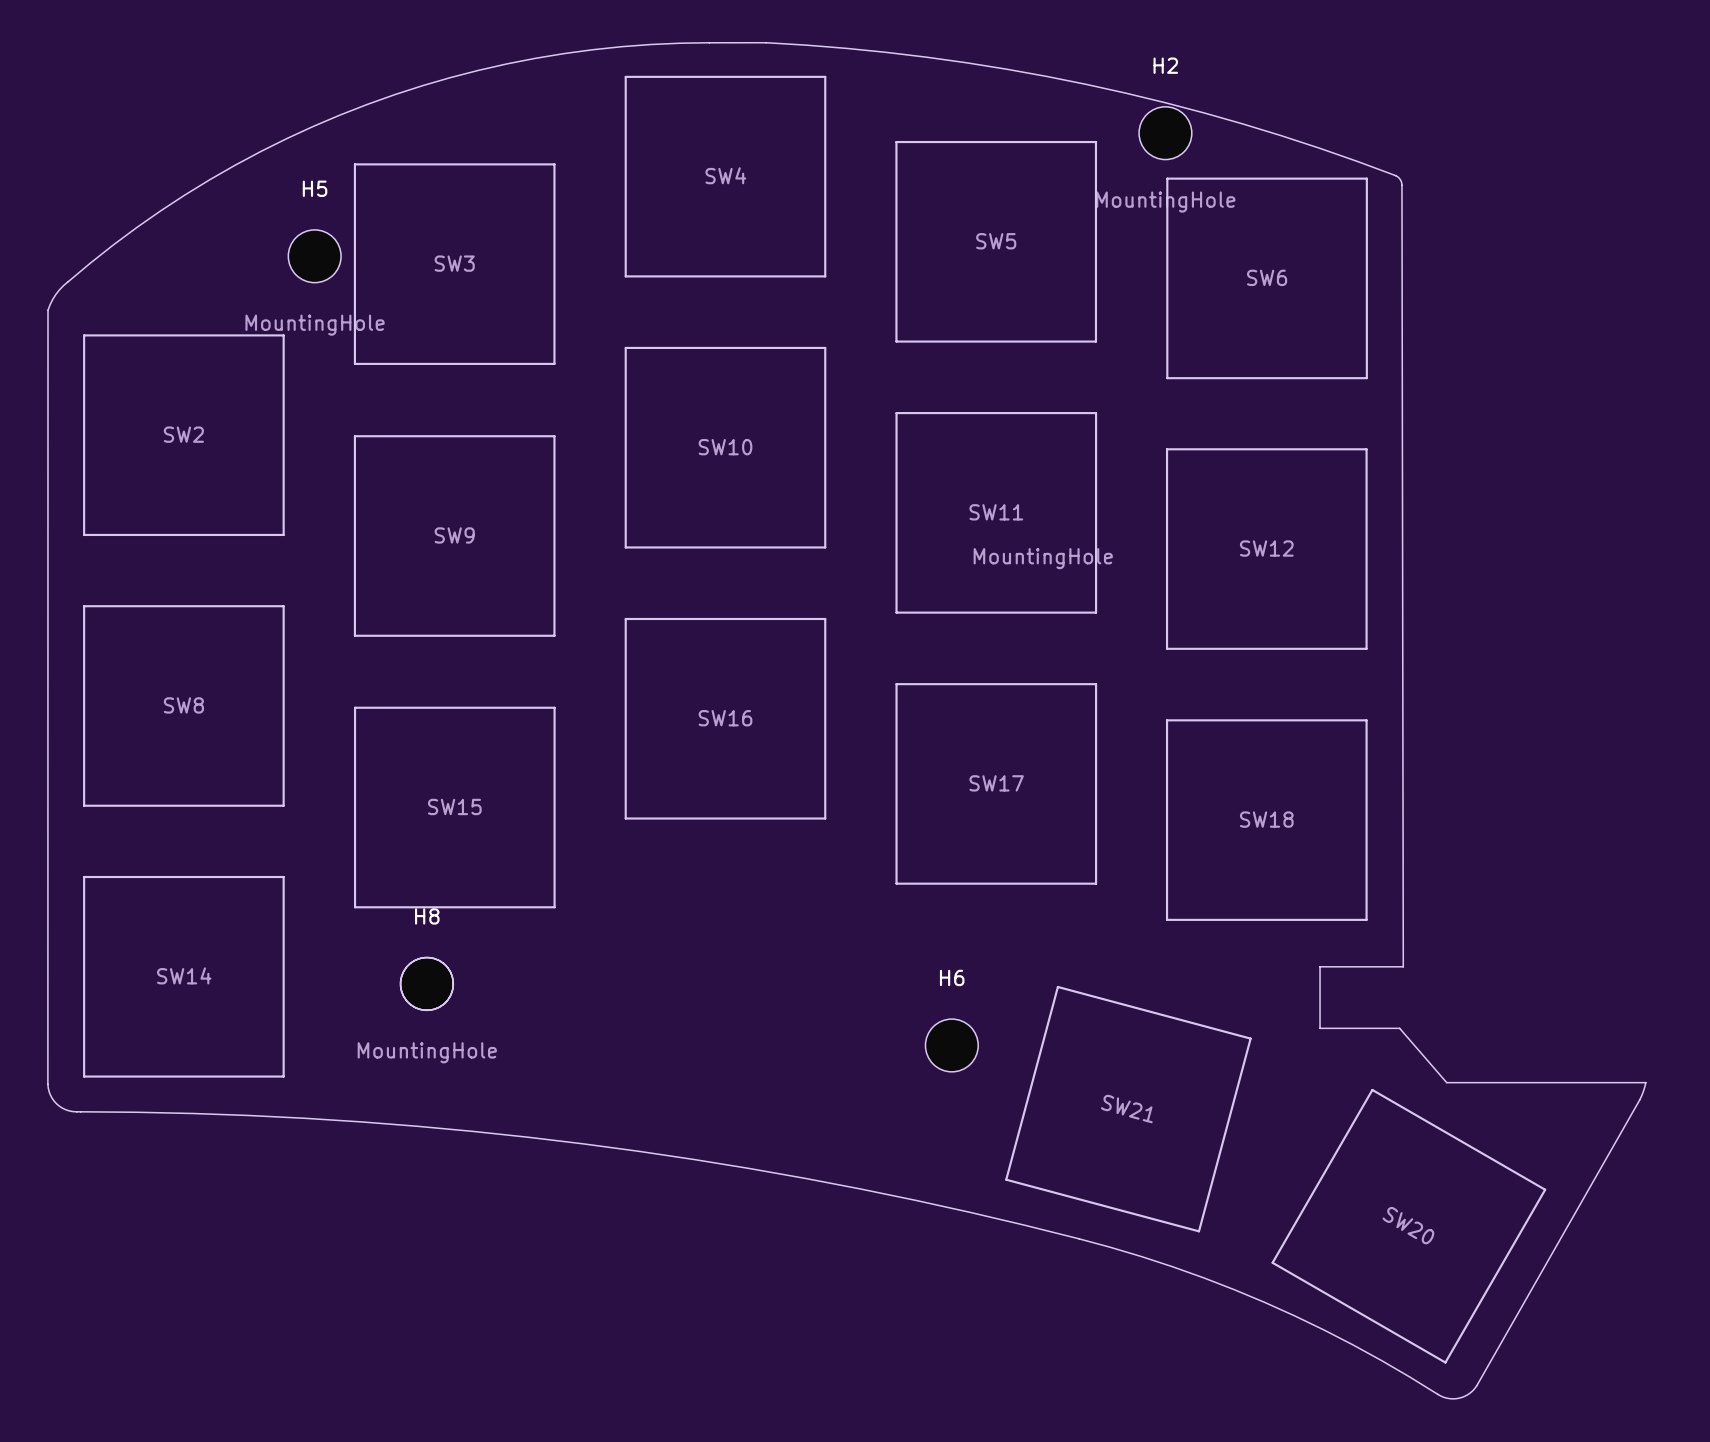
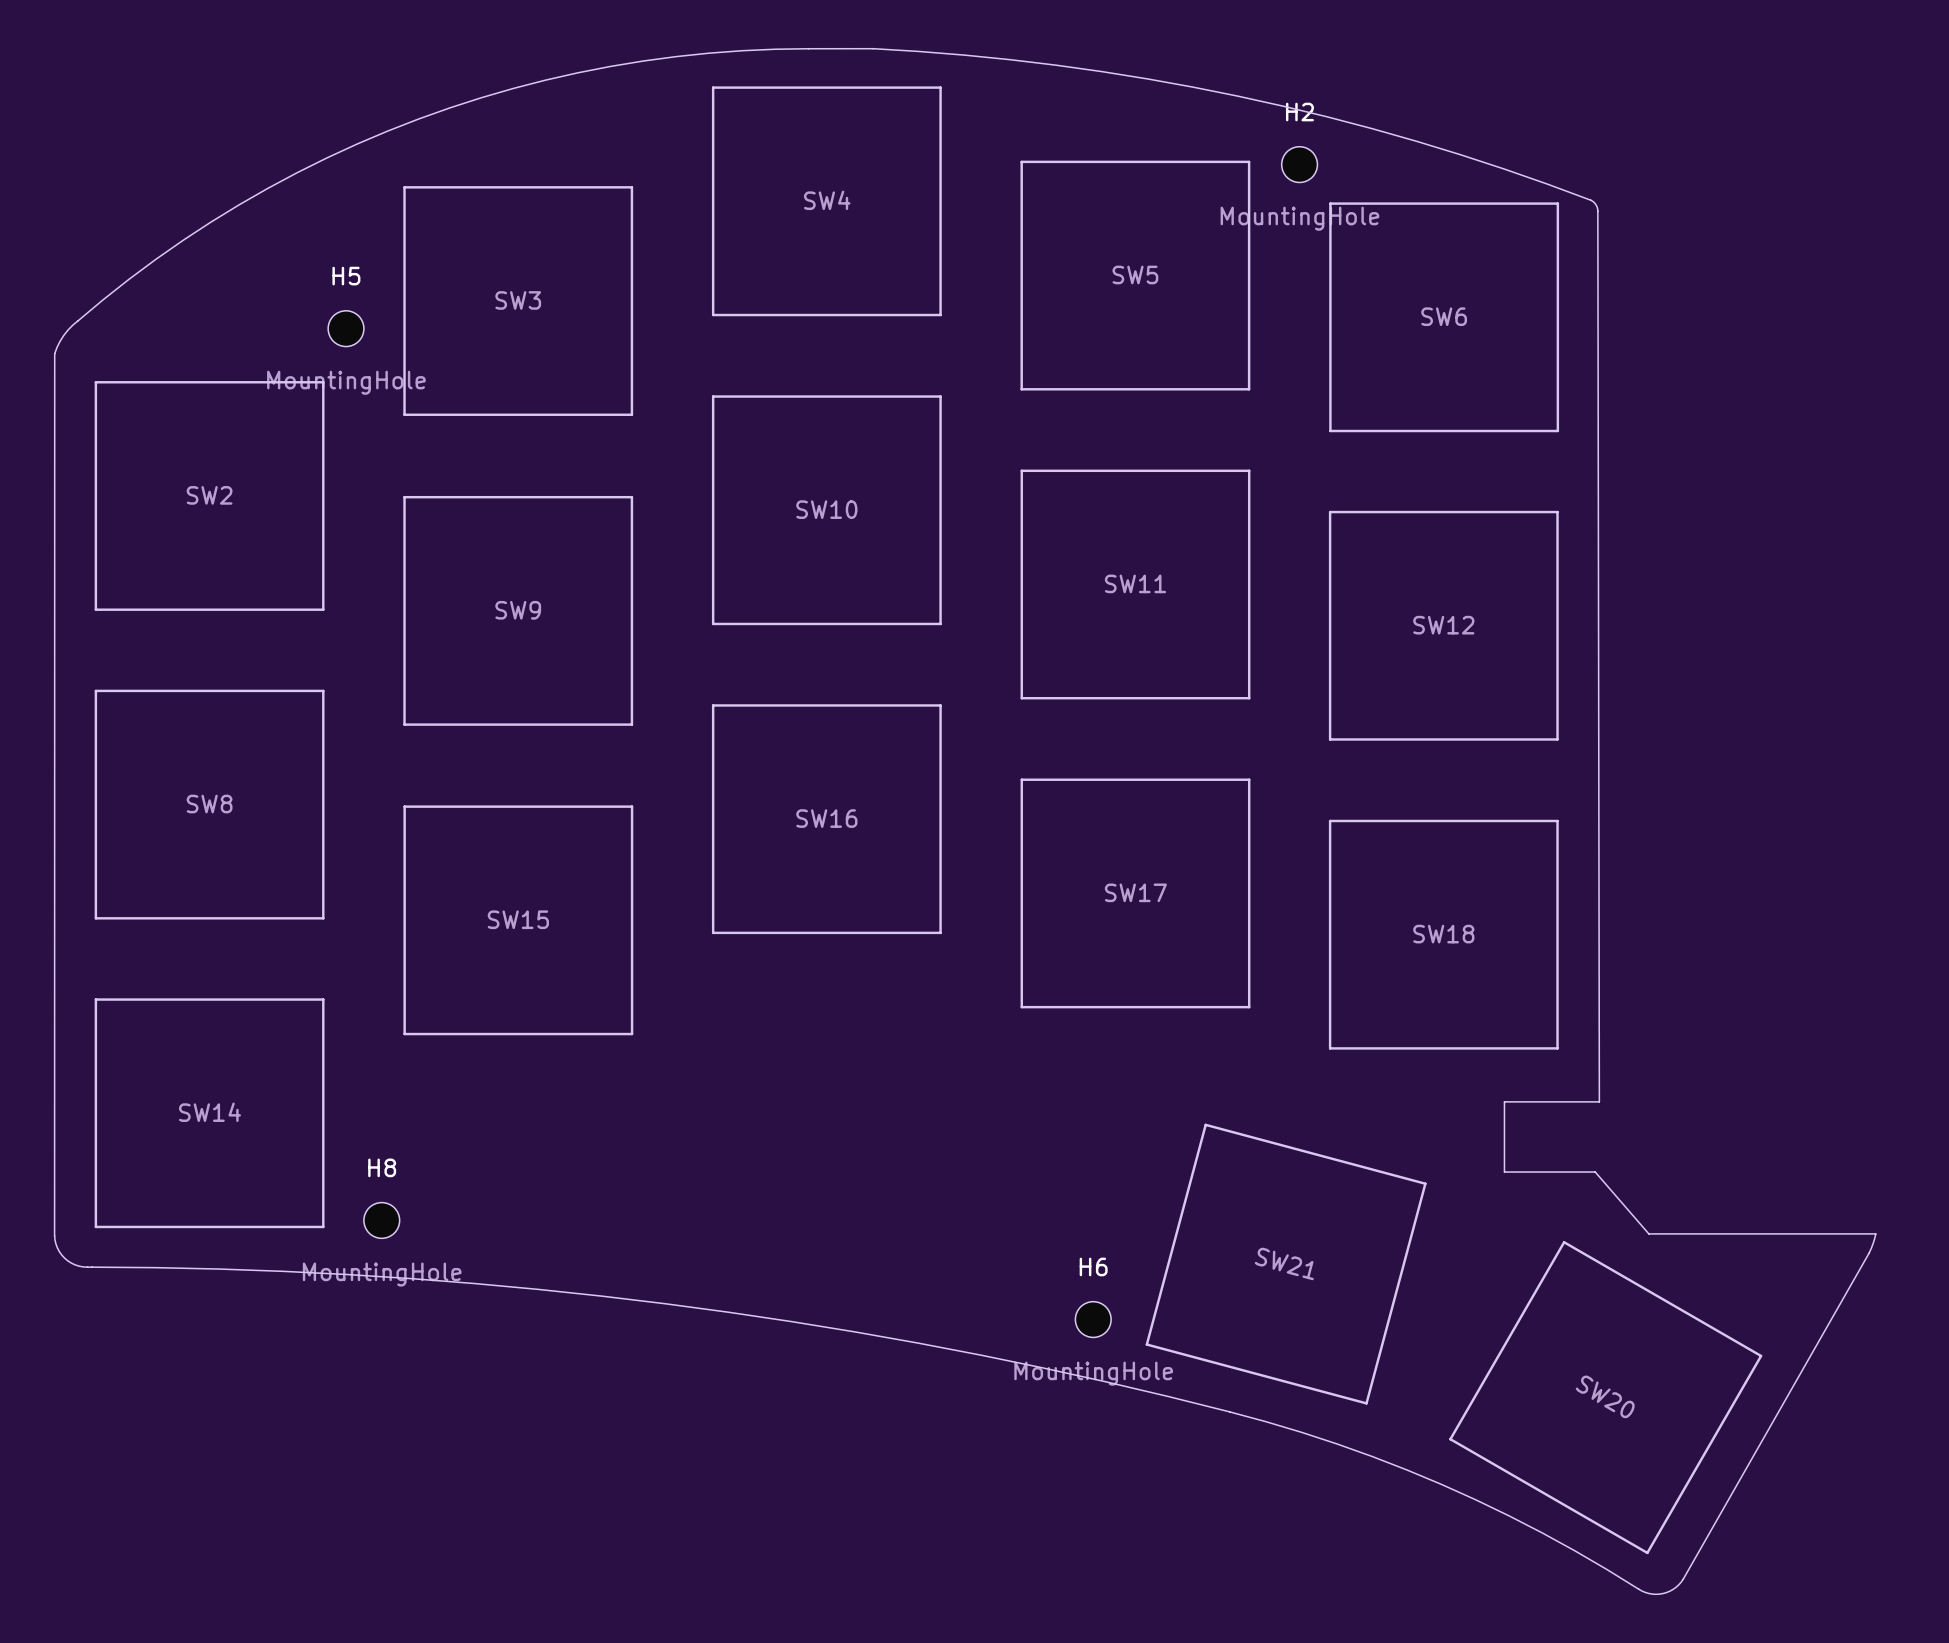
H2 footprint: [1139, 106, 1192, 160] -> [1281, 146, 1318, 183]
H5 footprint: [288, 229, 342, 283] -> [328, 310, 364, 347]
H6 value position: MountingHole (1043, 558) -> MountingHole (1093, 1373)
H8 footprint: [400, 957, 454, 1011] -> [363, 1202, 400, 1239]
part: (426, 983) -> none
H6 footprint: [925, 1019, 979, 1072] -> [1075, 1301, 1112, 1338]

